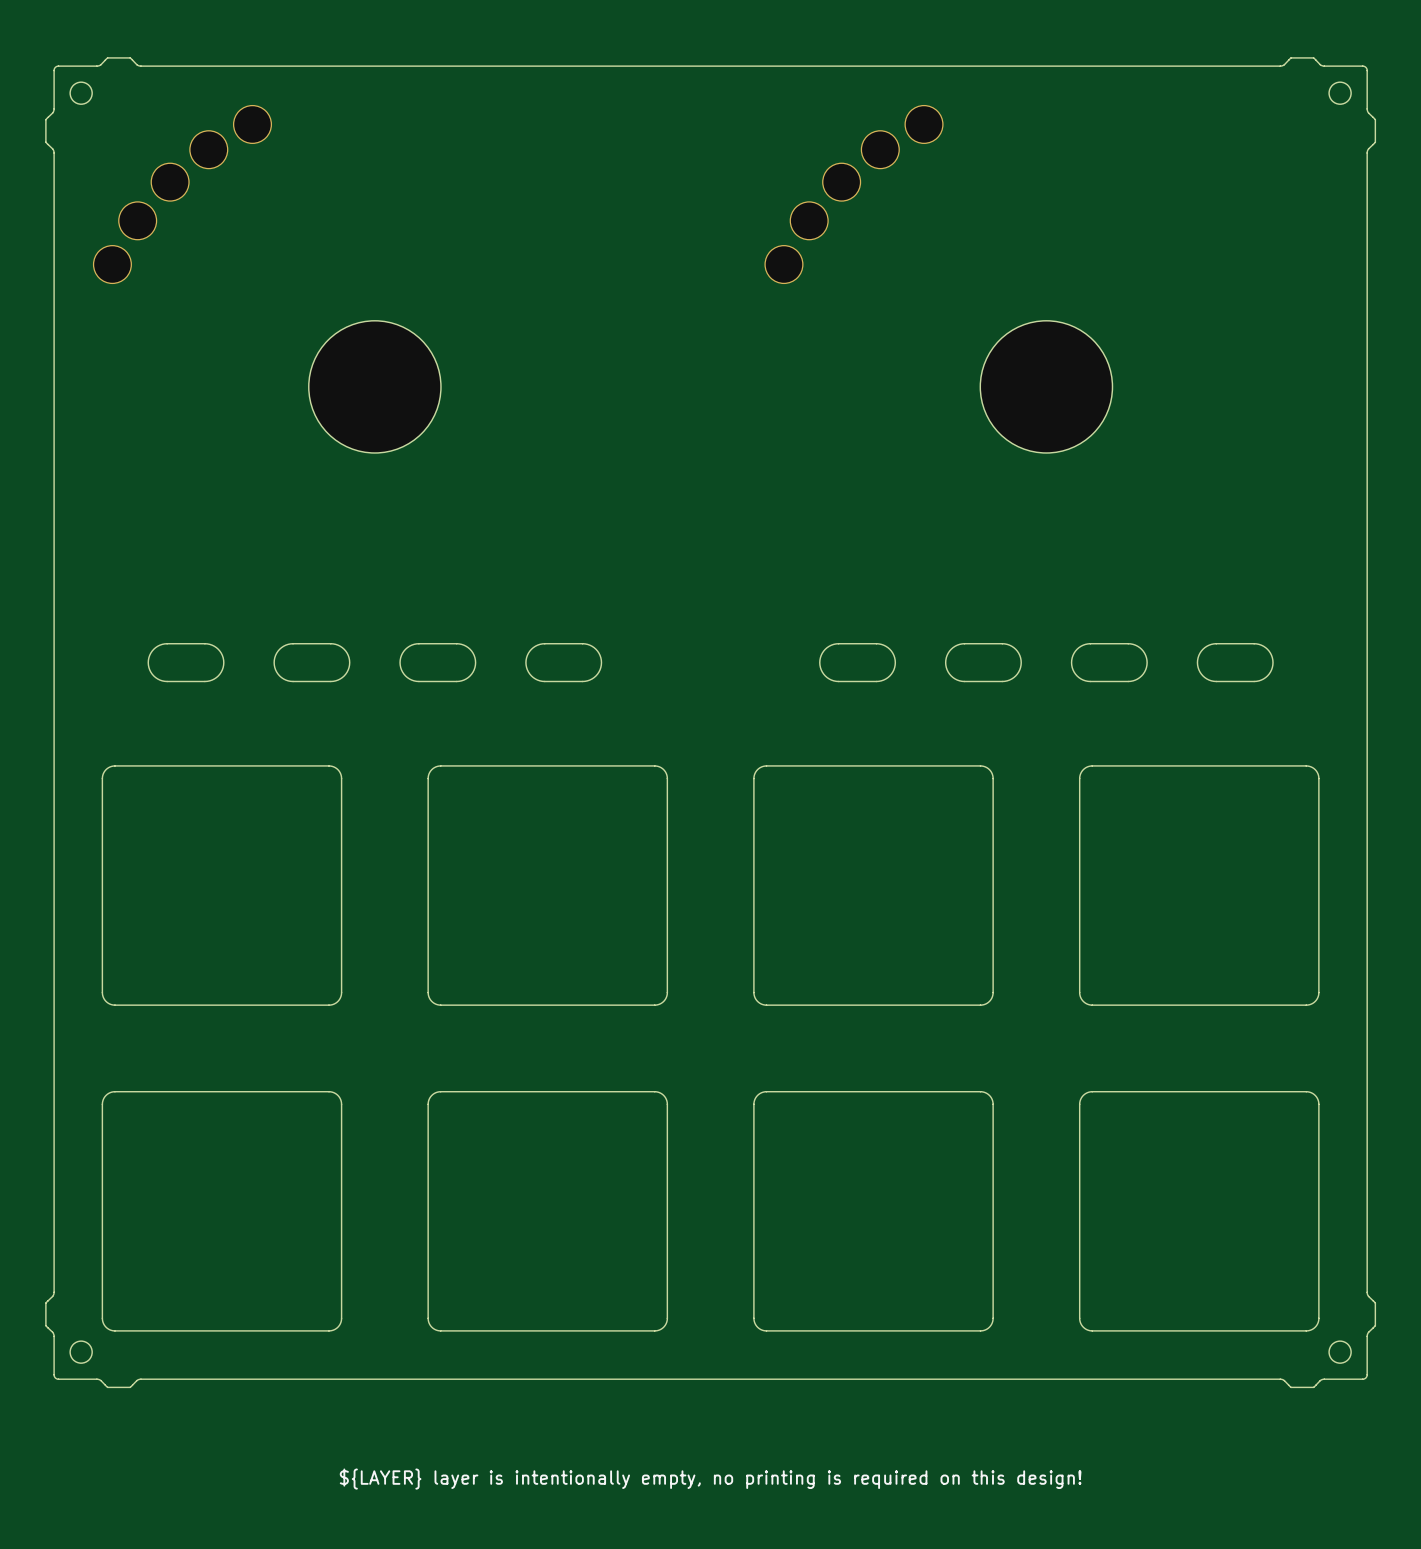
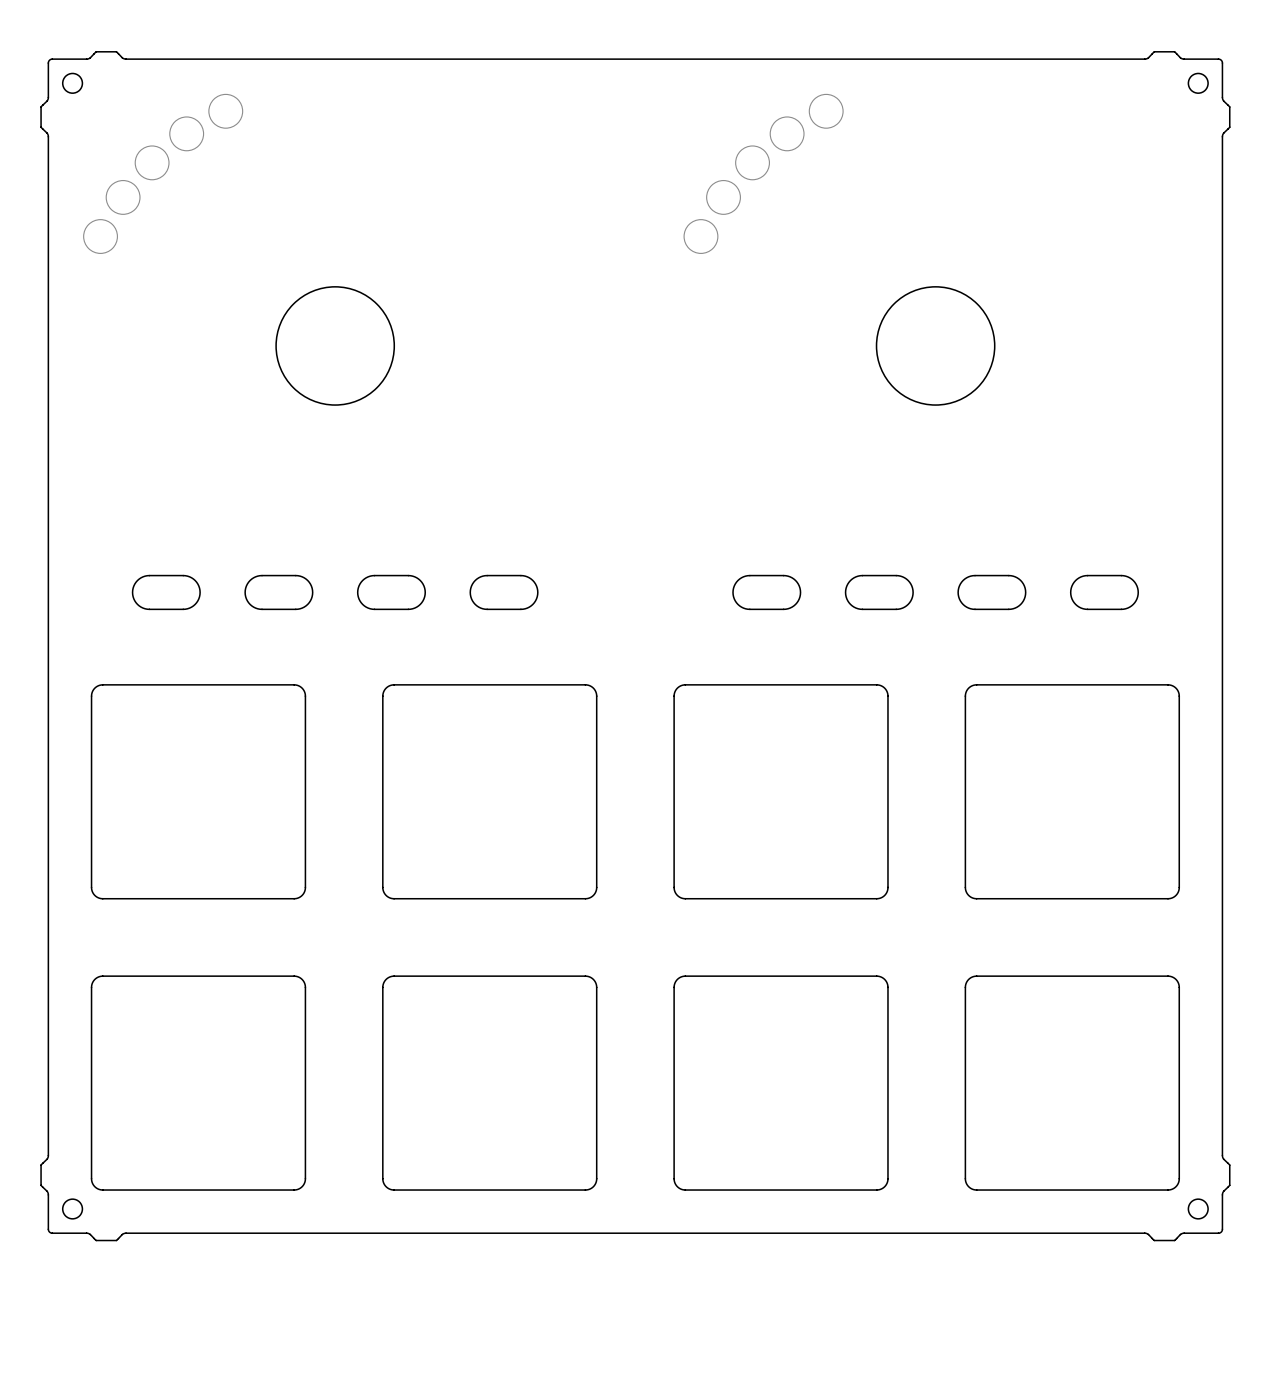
text: ${LAYER} layer is intentionally empty, no printing is required on this design! (710, 1479) -> none

